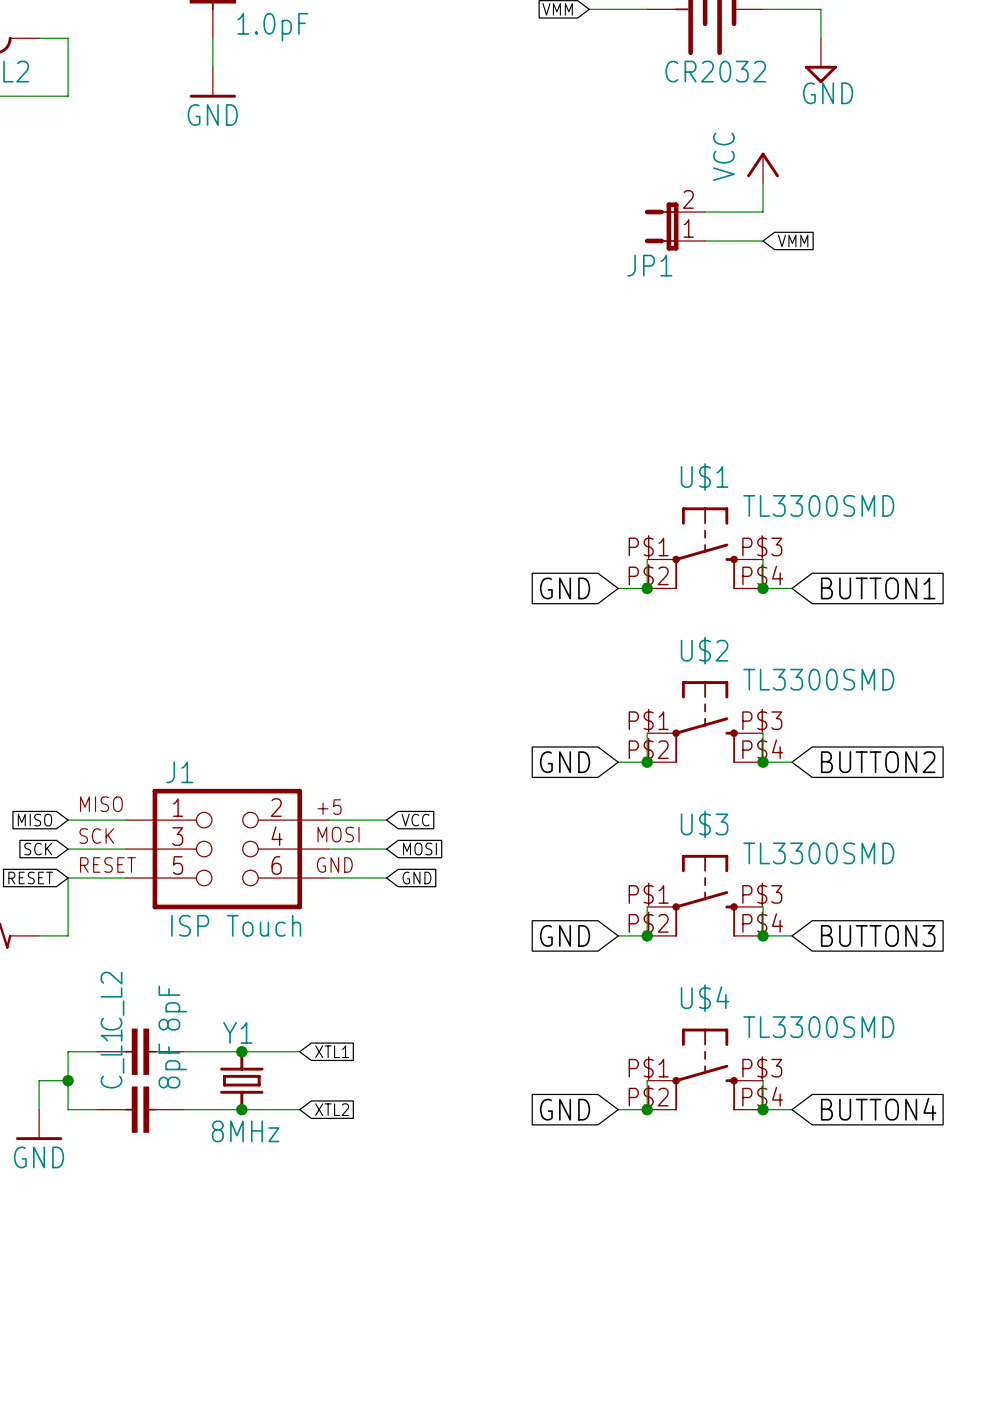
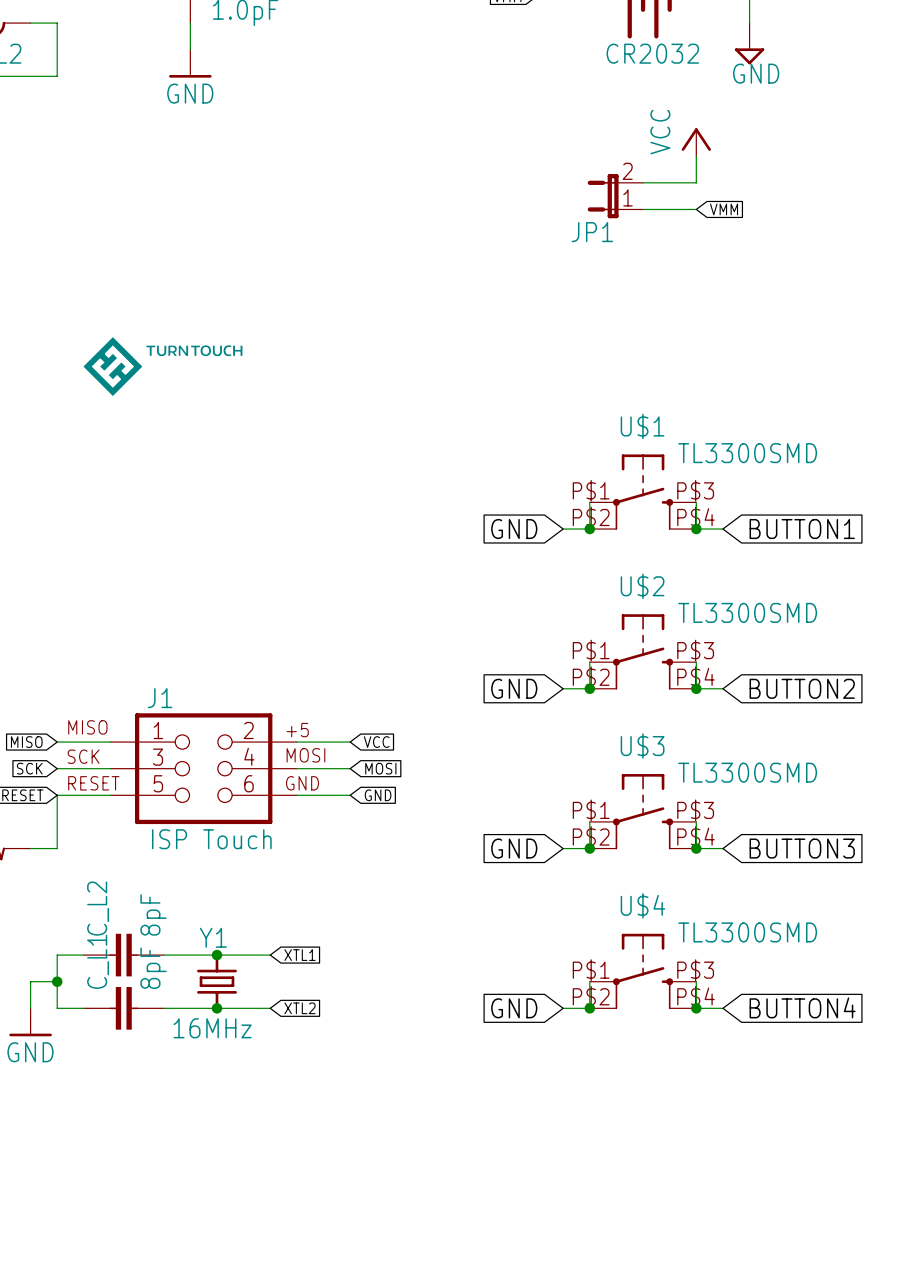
part: none -> (163, 366)
Y1 value: 8MHz (245, 1131) -> 16MHz (212, 1028)

